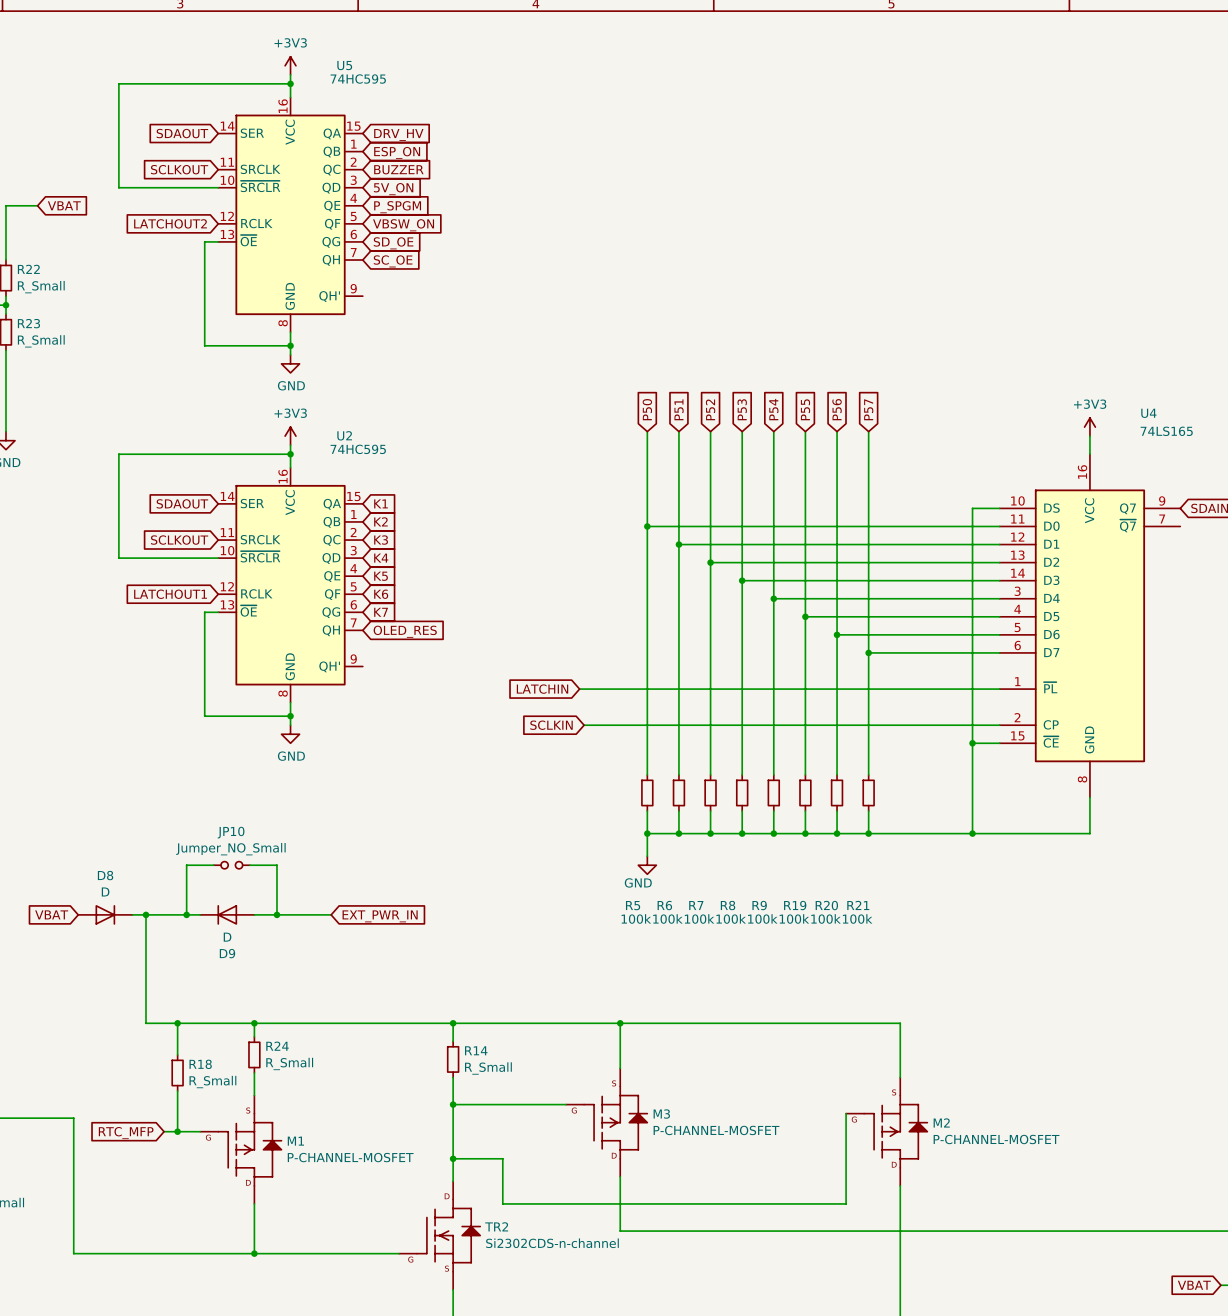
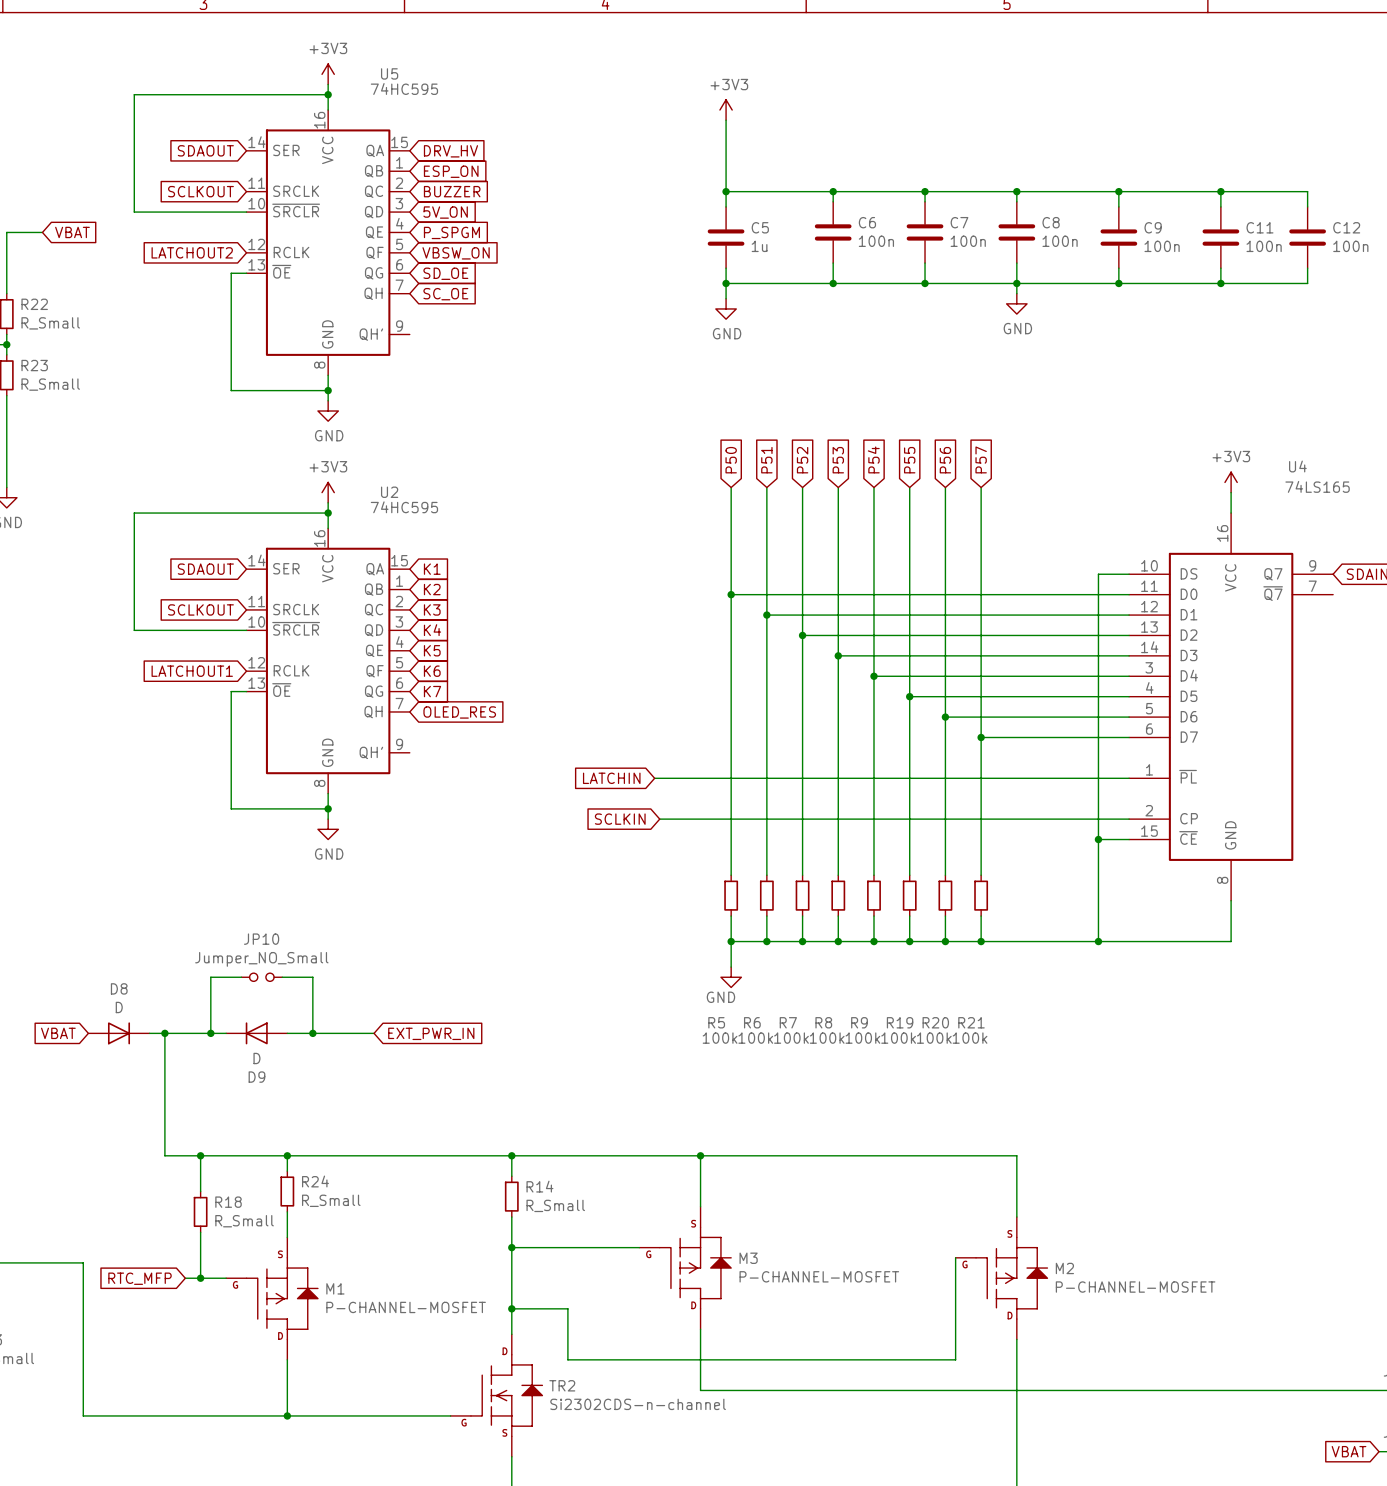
power symbol: none -> +3V3 (726, 110)
wire: none -> (726, 120) (726, 206)
wire: none -> (726, 191) (1307, 191) (1307, 206)
junction: none -> (726, 191)
wire: none -> (833, 191) (833, 201)
junction: none -> (833, 191)
wire: none -> (925, 191) (925, 201)
junction: none -> (925, 191)
wire: none -> (1016, 191) (1016, 201)
junction: none -> (1016, 191)
wire: none -> (1118, 191) (1118, 206)
junction: none -> (1118, 191)
wire: none -> (1220, 191) (1220, 206)
junction: none -> (1220, 191)
C6: none -> 100n (833, 232)
C7: none -> 100n (925, 232)
C8: none -> 100n (1016, 232)
C5: none -> 1u (726, 237)
C9: none -> 100n (1118, 237)
C11: none -> 100n (1220, 237)
C12: none -> 100n (1307, 237)
wire: none -> (833, 263) (833, 283)
wire: none -> (925, 263) (925, 283)
wire: none -> (1016, 263) (1016, 293)
wire: none -> (726, 268) (726, 298)
wire: none -> (1118, 268) (1118, 283)
wire: none -> (1220, 268) (1220, 283)
wire: none -> (1307, 268) (1307, 283) (726, 283)
junction: none -> (726, 283)
junction: none -> (833, 283)
junction: none -> (925, 283)
junction: none -> (1016, 283)
junction: none -> (1118, 283)
junction: none -> (1220, 283)
power symbol: none -> GND (1016, 303)
power symbol: none -> GND (726, 308)

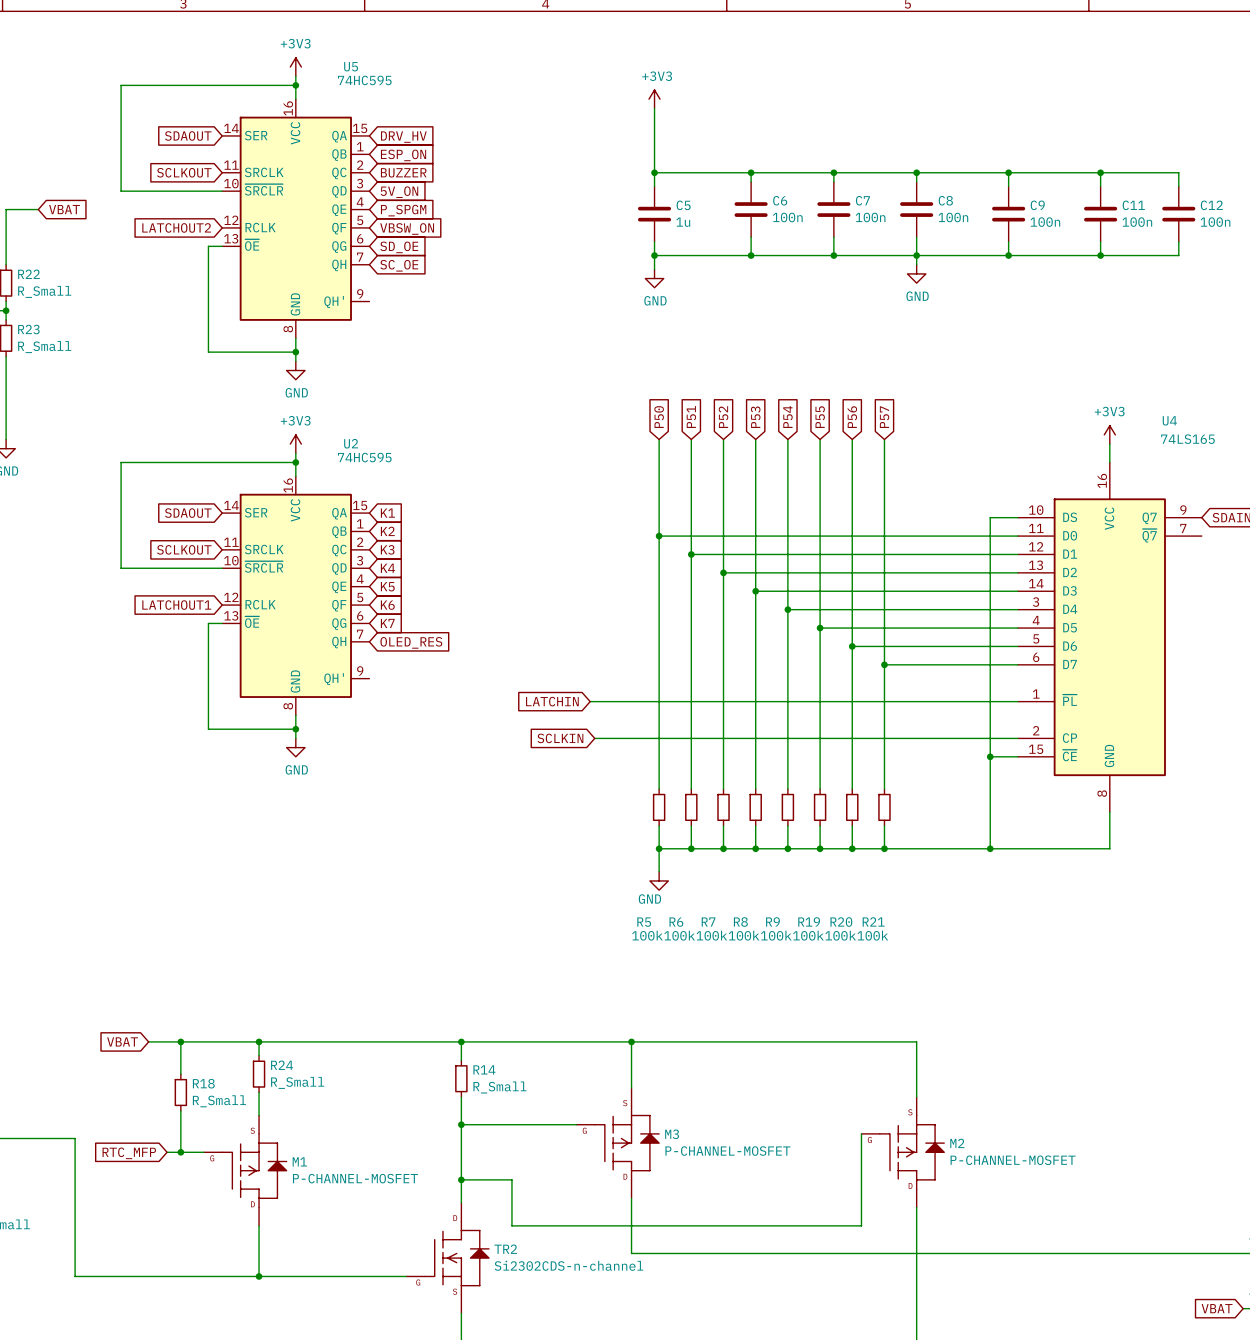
wire: (241, 977) (210, 977) (210, 1033) -> none
JP10: Jumper_NO_Small (261, 977) -> none
wire: (282, 977) (312, 977) (312, 1033) -> none
global label position: VBAT (58, 1033) -> VBAT (122, 1041)
D8: D (119, 1033) -> none
wire: (149, 1033) (226, 1033) -> none
wire: (164, 1033) (164, 1155) -> none
junction: (164, 1033) -> none
junction: (210, 1033) -> none
D9: D (256, 1033) -> none
wire: (287, 1033) (374, 1033) -> none
junction: (312, 1033) -> none
global label: EXT_PWR_IN (431, 1033) -> none

